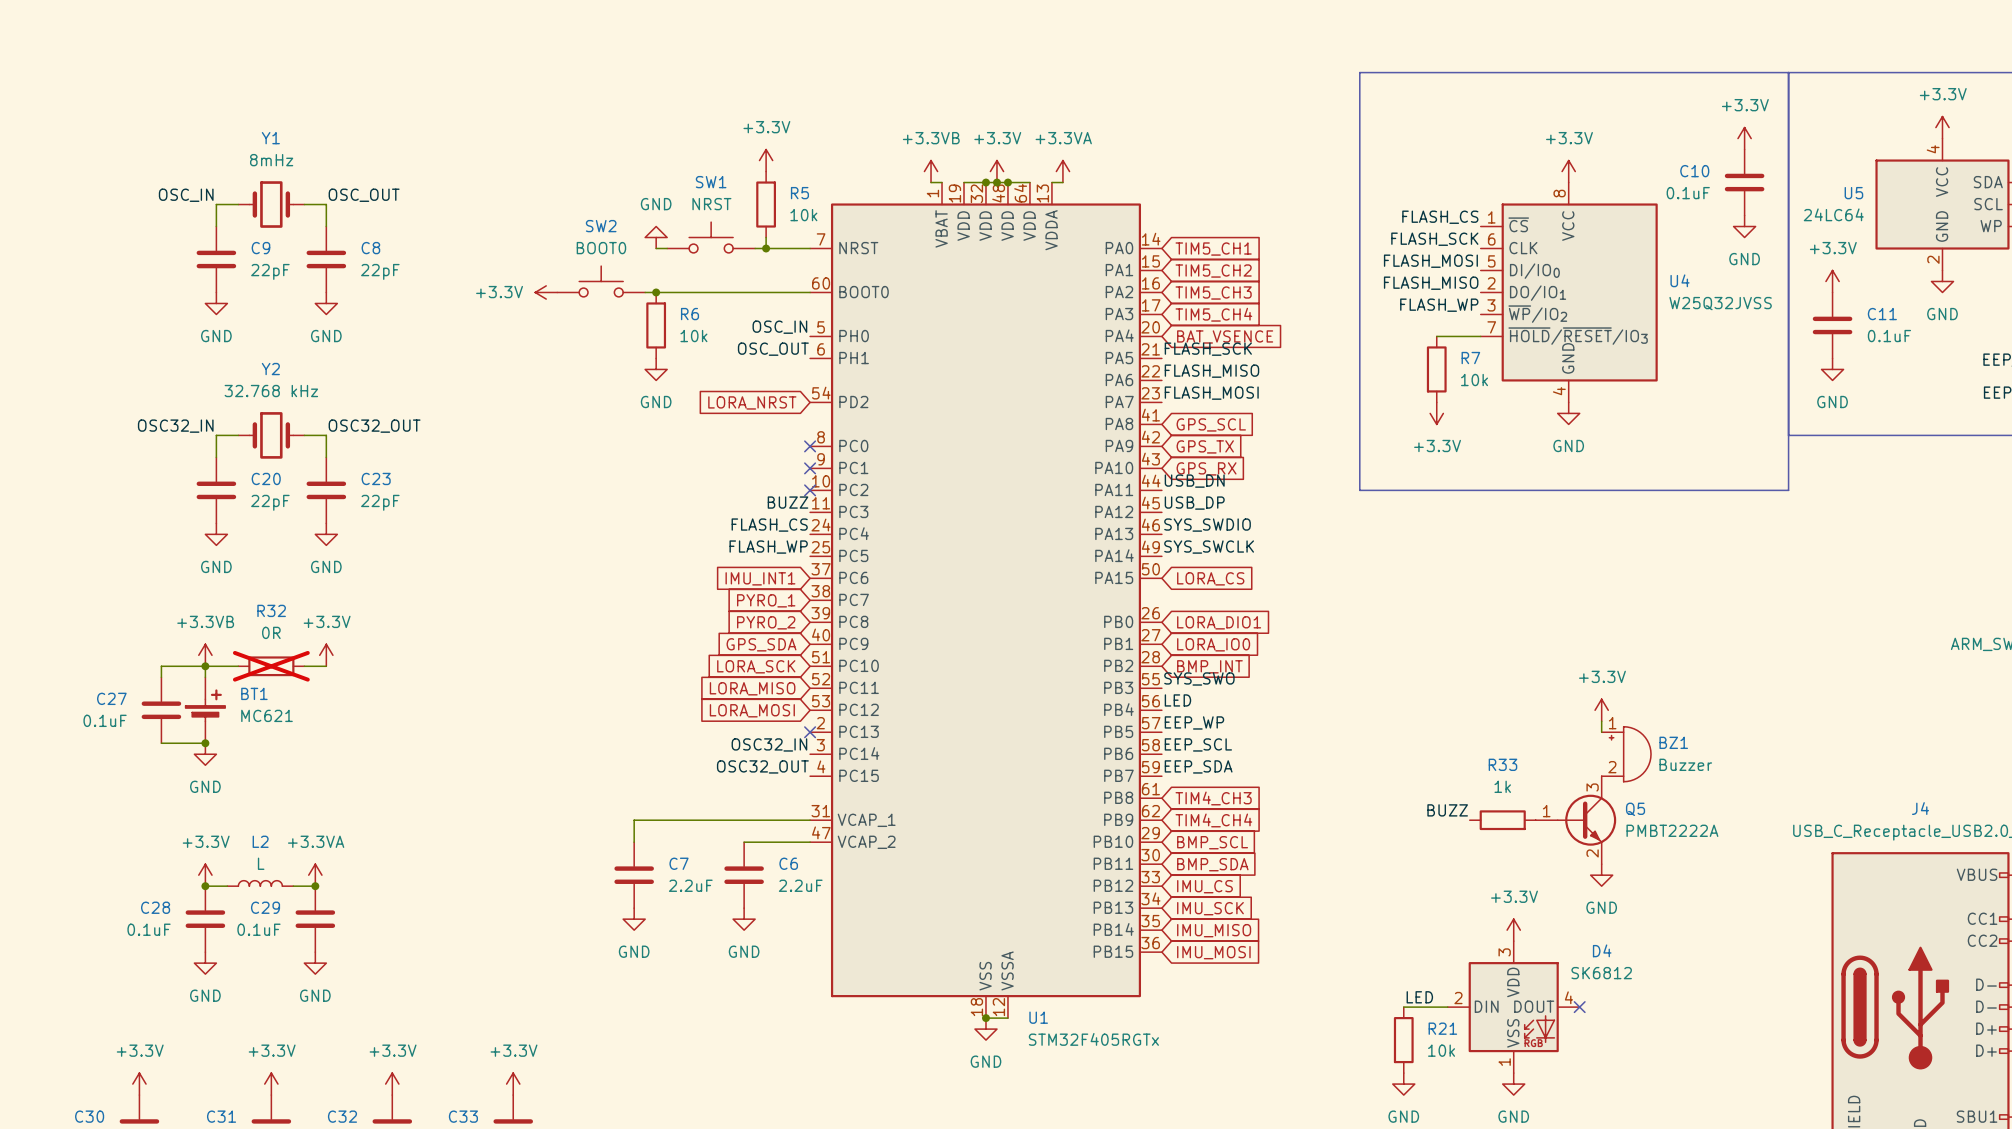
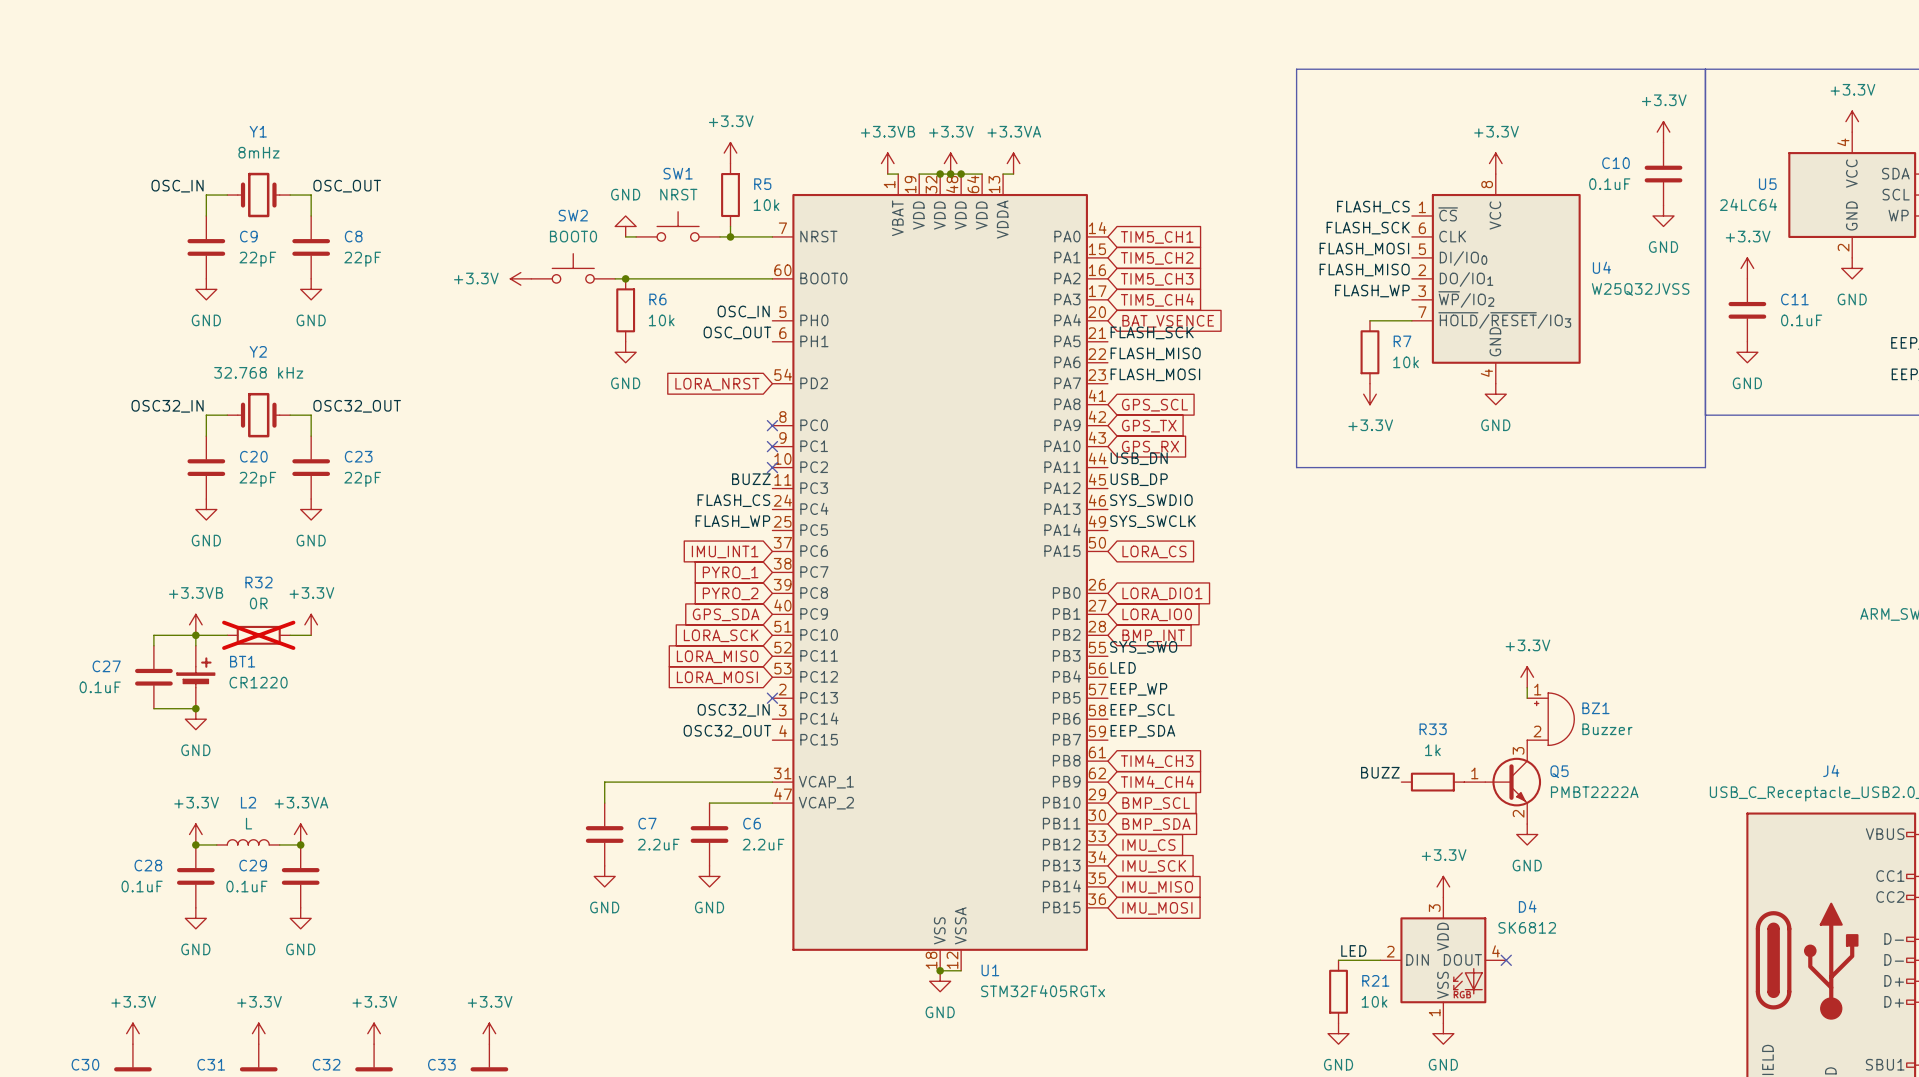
BT1 value: MC621 (266, 715) -> CR1220 (258, 682)

